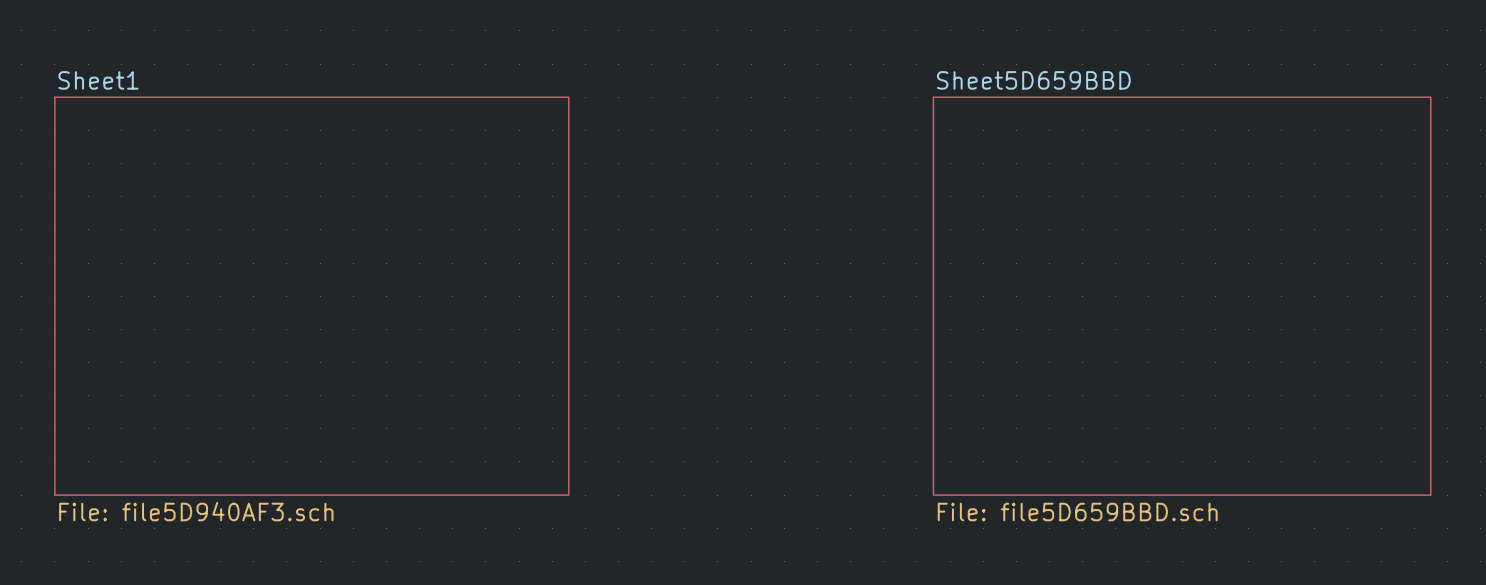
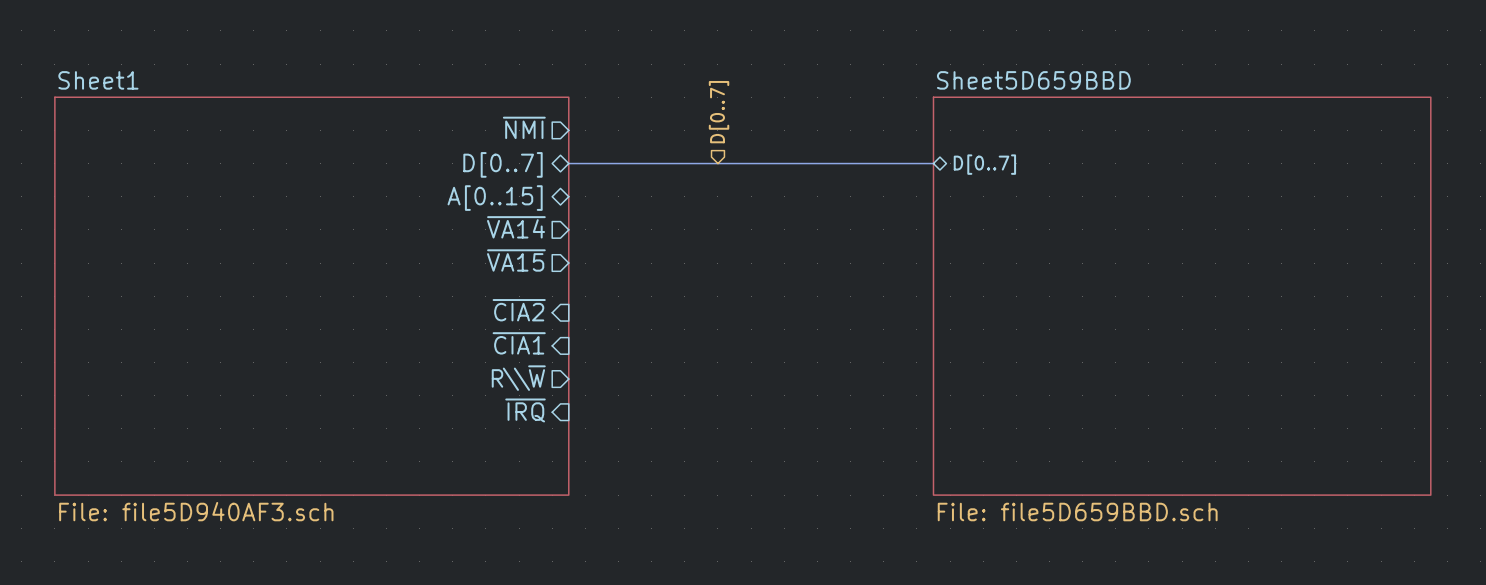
hierarchical label: none -> D[0..7] (719, 112)
sheet pin: none -> ~{NMI} (524, 127)
bus: none -> (568, 163) (933, 163)
sheet pin: none -> D[0..7] (503, 164)
sheet pin: none -> D[0..7] (984, 164)
sheet pin: none -> A[0..15] (495, 198)
sheet pin: none -> ~{VA14} (516, 227)
sheet pin: none -> ~{VA15} (516, 260)
sheet pin: none -> ~{CIA2} (519, 310)
sheet pin: none -> ~{CIA1} (519, 343)
sheet pin: none -> R\\~{W} (518, 378)
sheet pin: none -> ~{IRQ} (525, 410)

